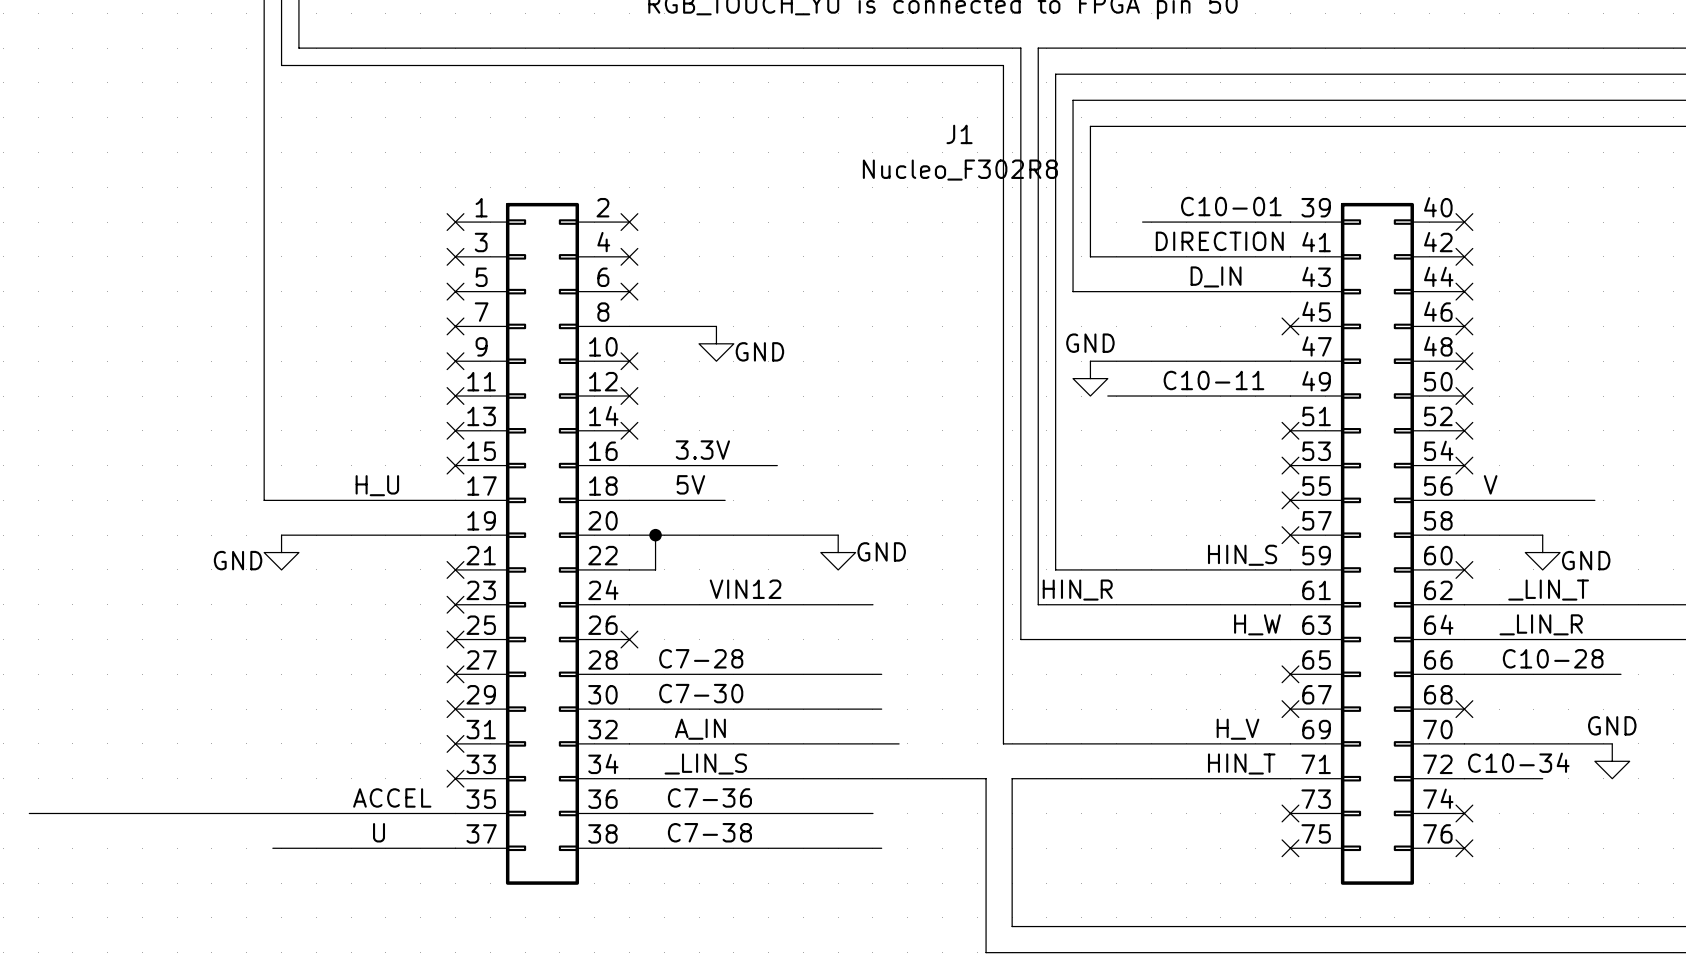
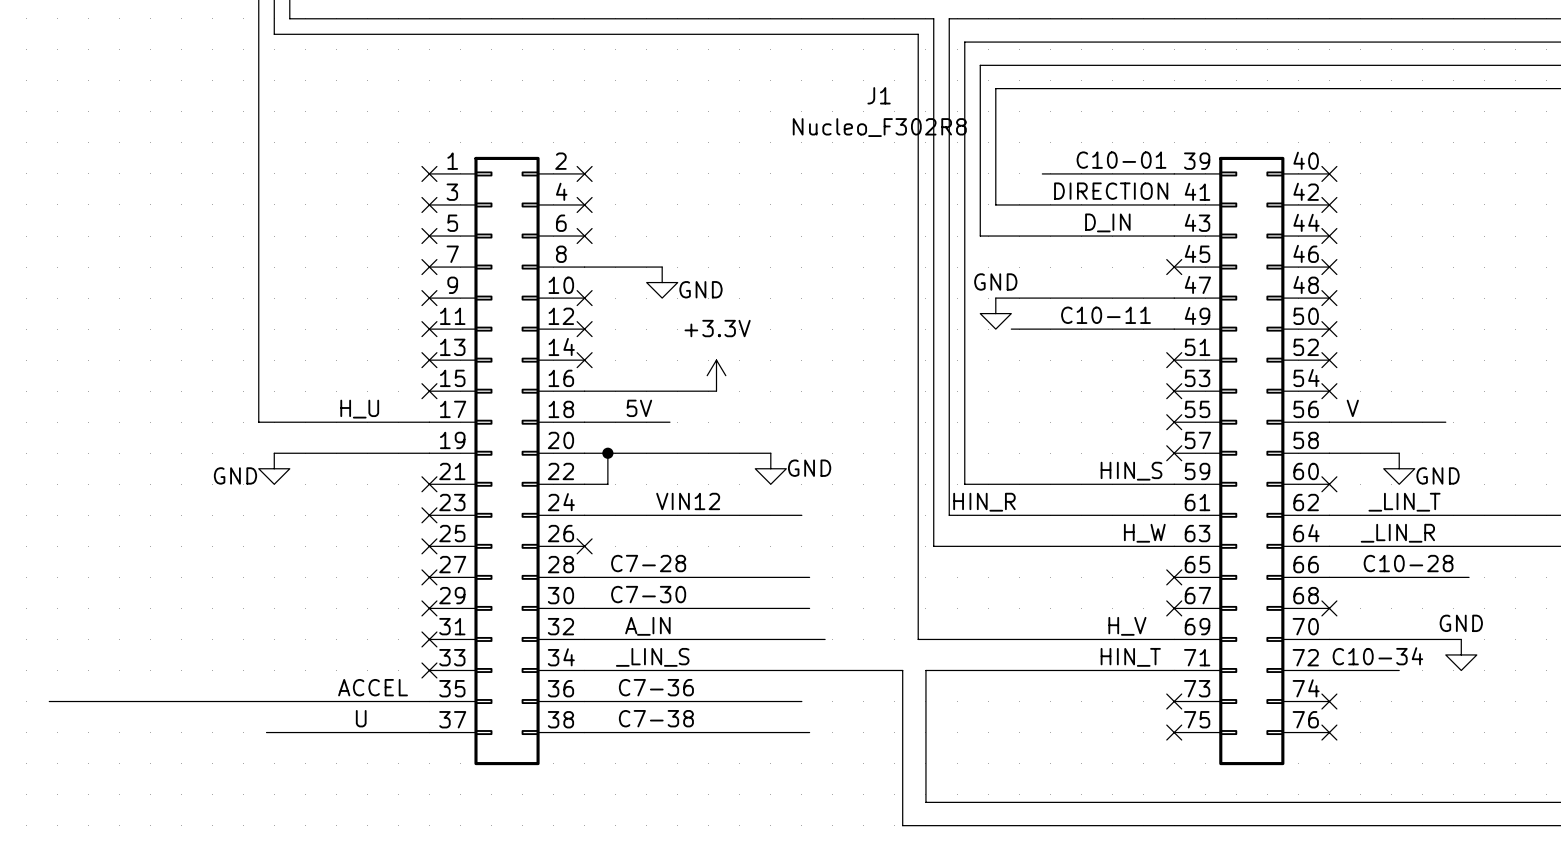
power symbol: none -> +3.3V (716, 375)
label: 3.3V (702, 450) -> none

